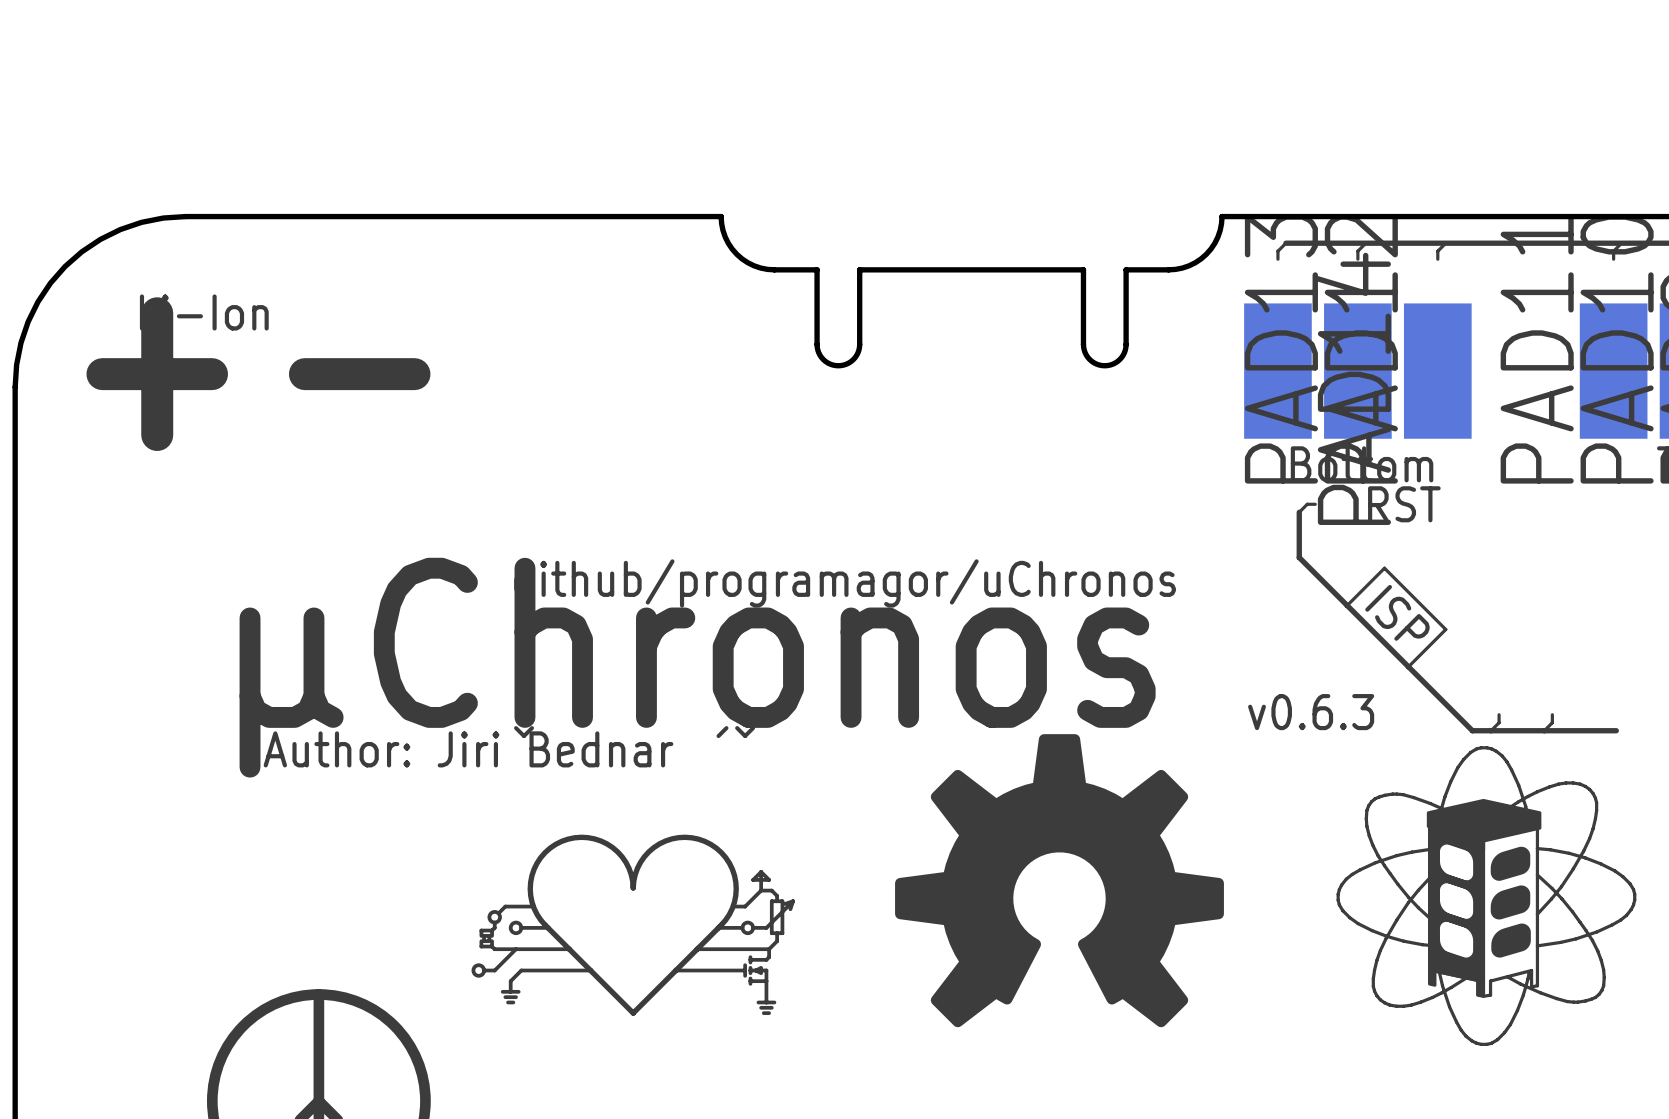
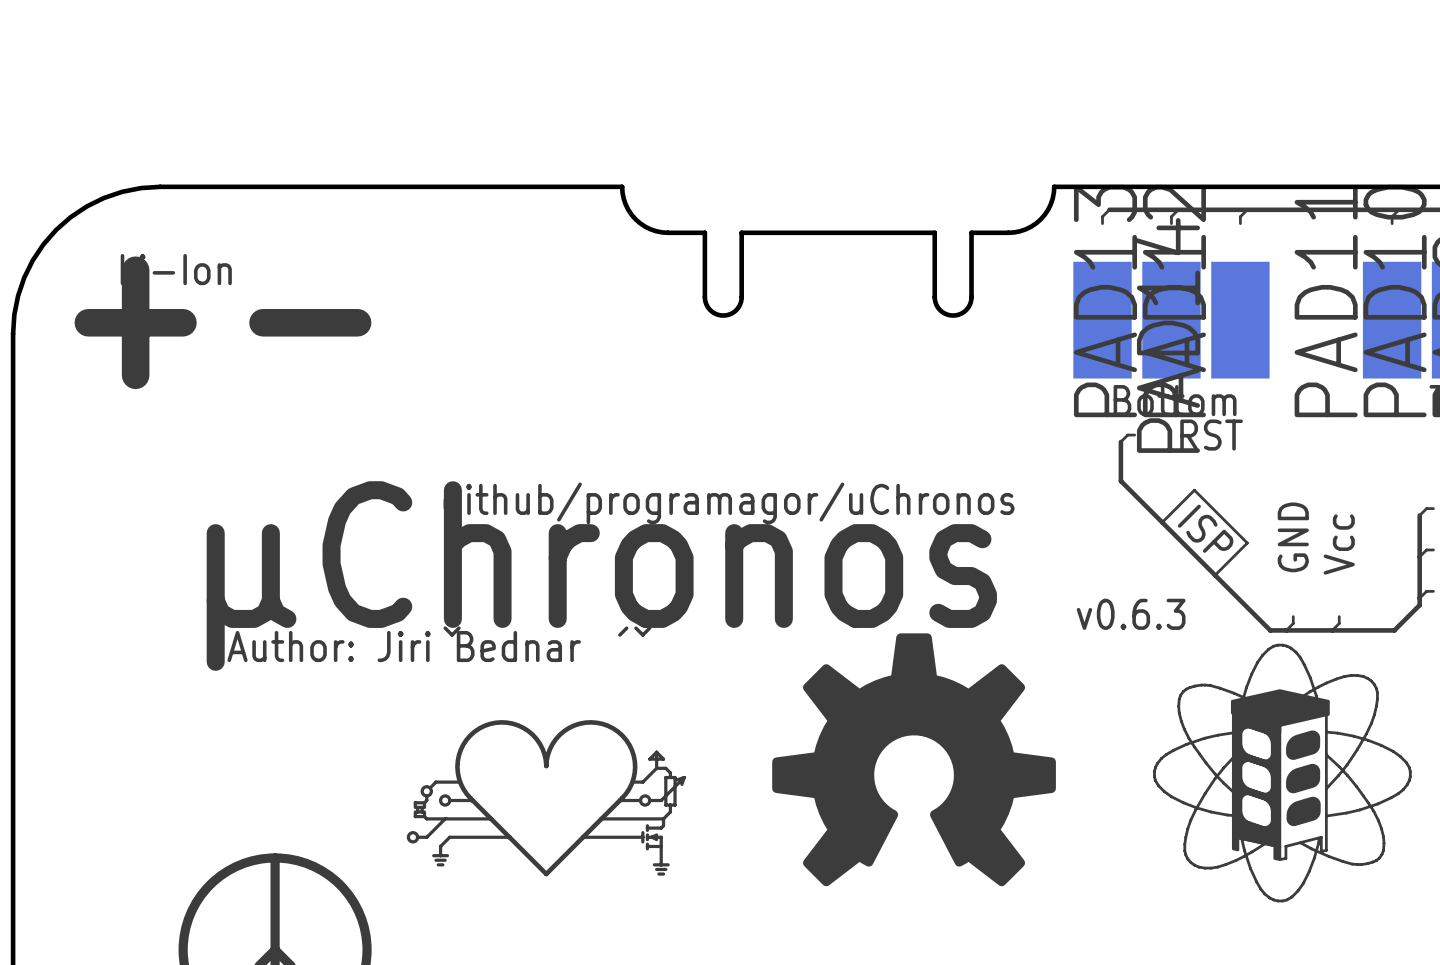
line: none -> (1433, 508) (1426, 508) (1419, 515) (1419, 605) (1394, 630)
text: none -> GND (1293, 537)
text: none -> Vcc (1339, 544)
line: none -> (1433, 549) (1426, 549) (1419, 556)
line: none -> (1433, 591) (1426, 591) (1419, 598)

